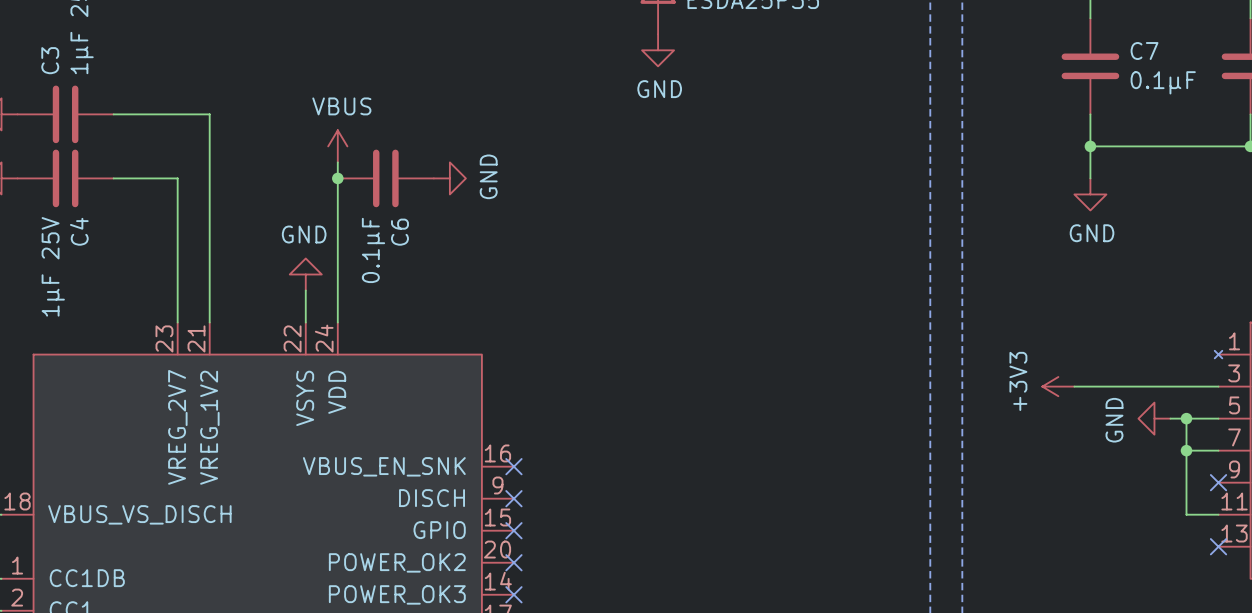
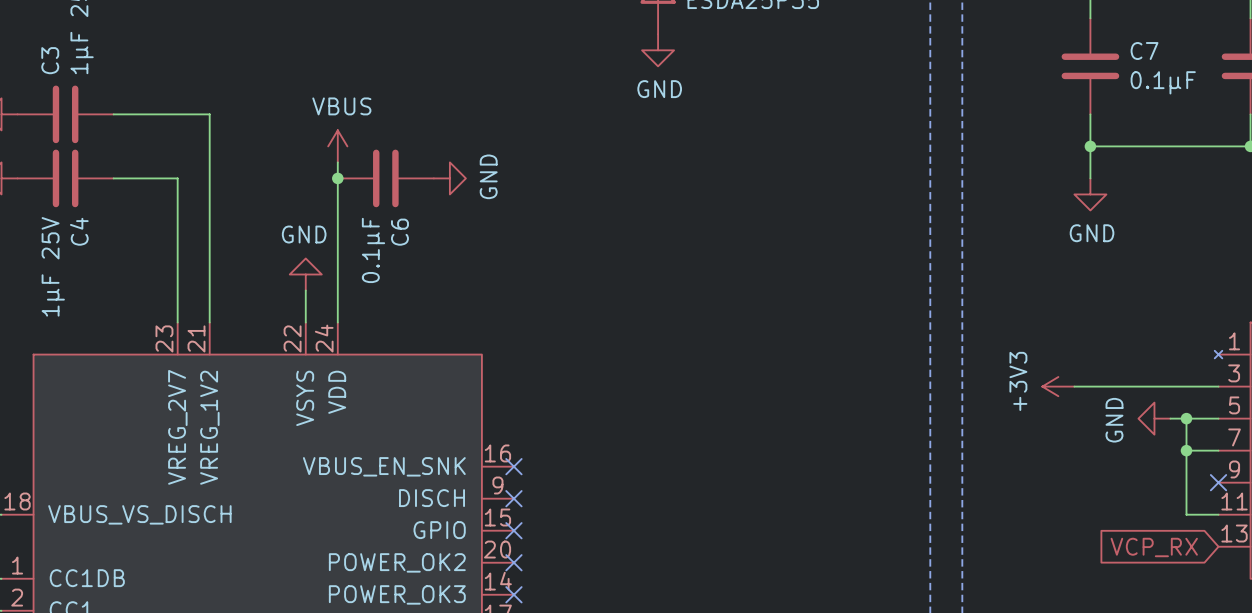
no-connect mark: (1218, 546) -> none
global label: none -> VCP_RX (1154, 547)

